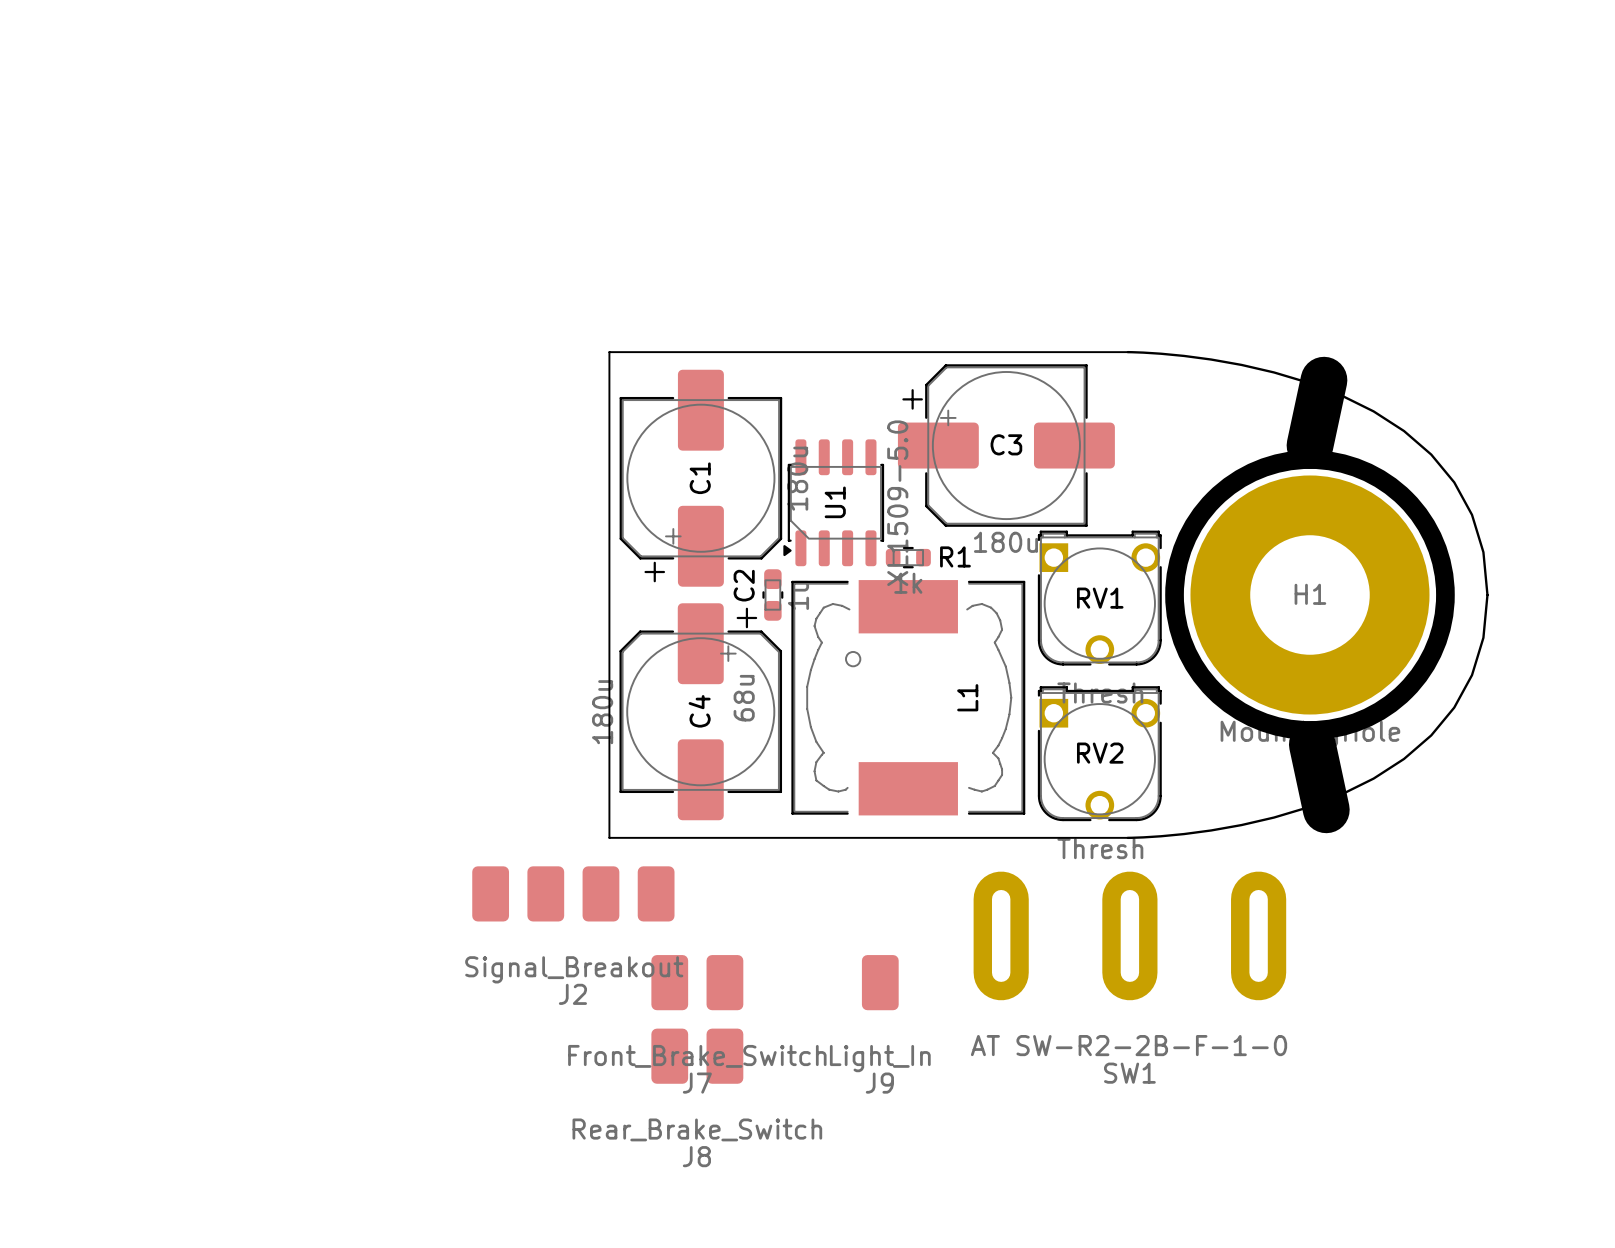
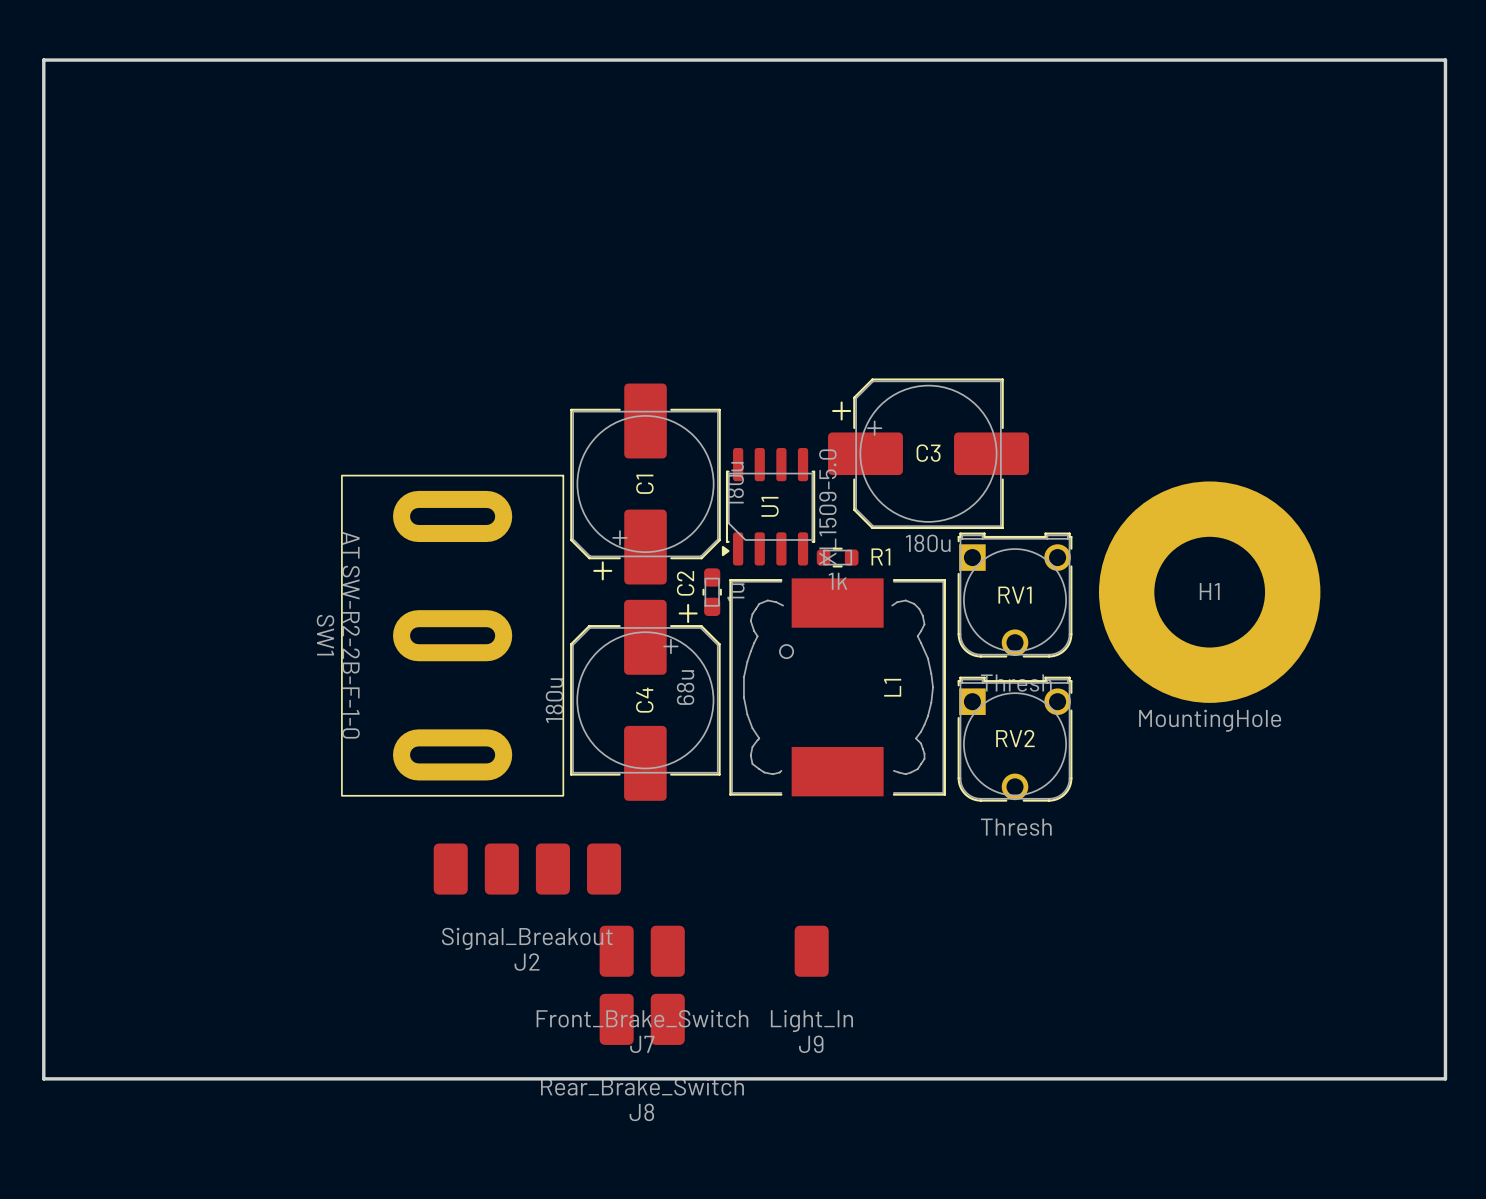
board edge: none -> (43, 60) (1445, 60) (1445, 1078) (43, 1078) (43, 60)
board edge: (609, 352) (609, 837) (1131, 837) (1184, 834) (1241, 825) (1307, 807) (1341, 794) (1373, 778) (1404, 758) (1431, 735) (1454, 707) (1472, 675) (1483, 637) (1487, 594) (1483, 552) (1472, 514) (1454, 482) (1431, 454) (1404, 431) (1373, 411) (1341, 395) (1307, 382) (1241, 364) (1184, 355) (1143, 352) (609, 352) -> none
line: (1323, 380) (1309, 445) -> none
drawing: [1165, 450, 1455, 740] -> none
line: (1312, 744) (1326, 809) -> none
SW1 footprint: [973, 871, 1287, 1001] -> [341, 474, 565, 797]
SW1 value position: AT SW-R2-2B-F-1-0 (1129, 1045) -> AT SW-R2-2B-F-1-0 (351, 635)
SW1 name position: SW1 (1129, 1073) -> SW1 (325, 635)

